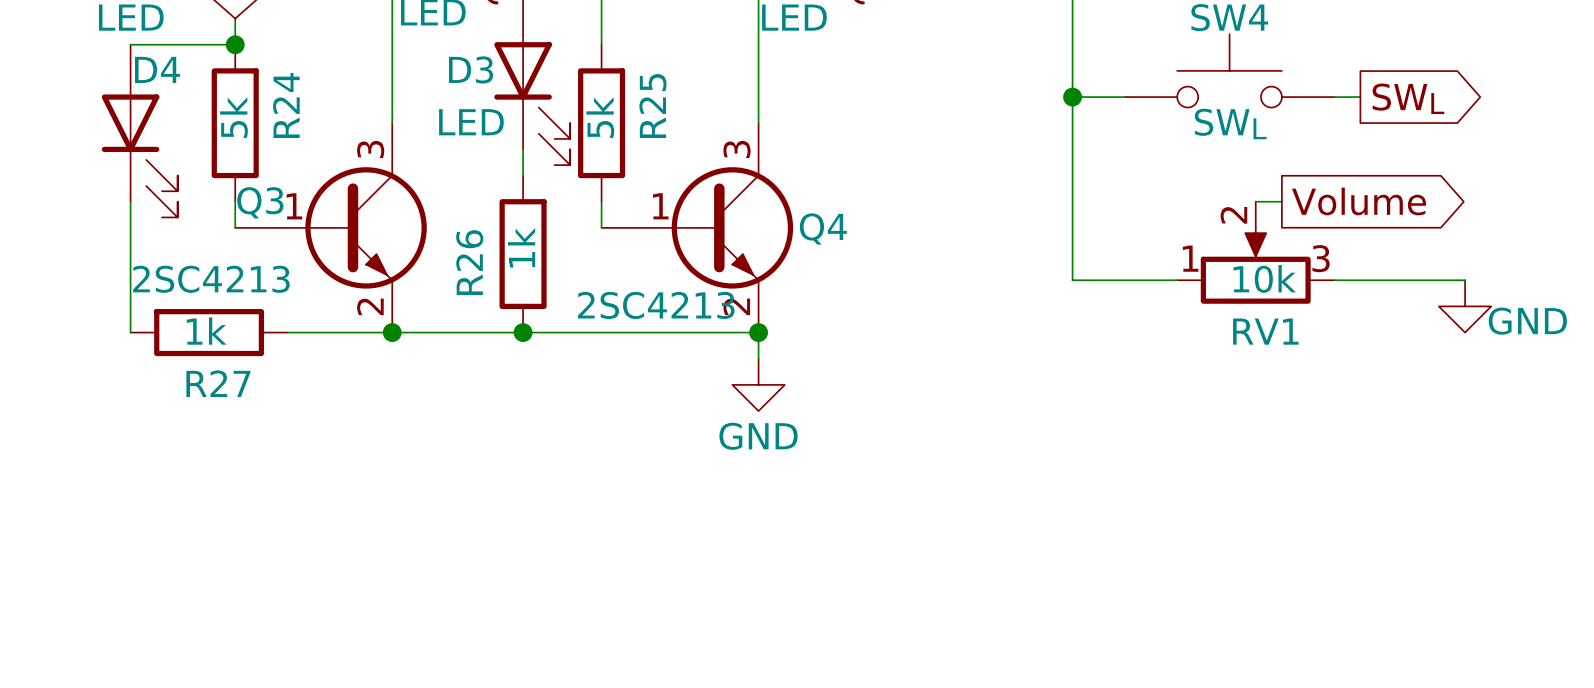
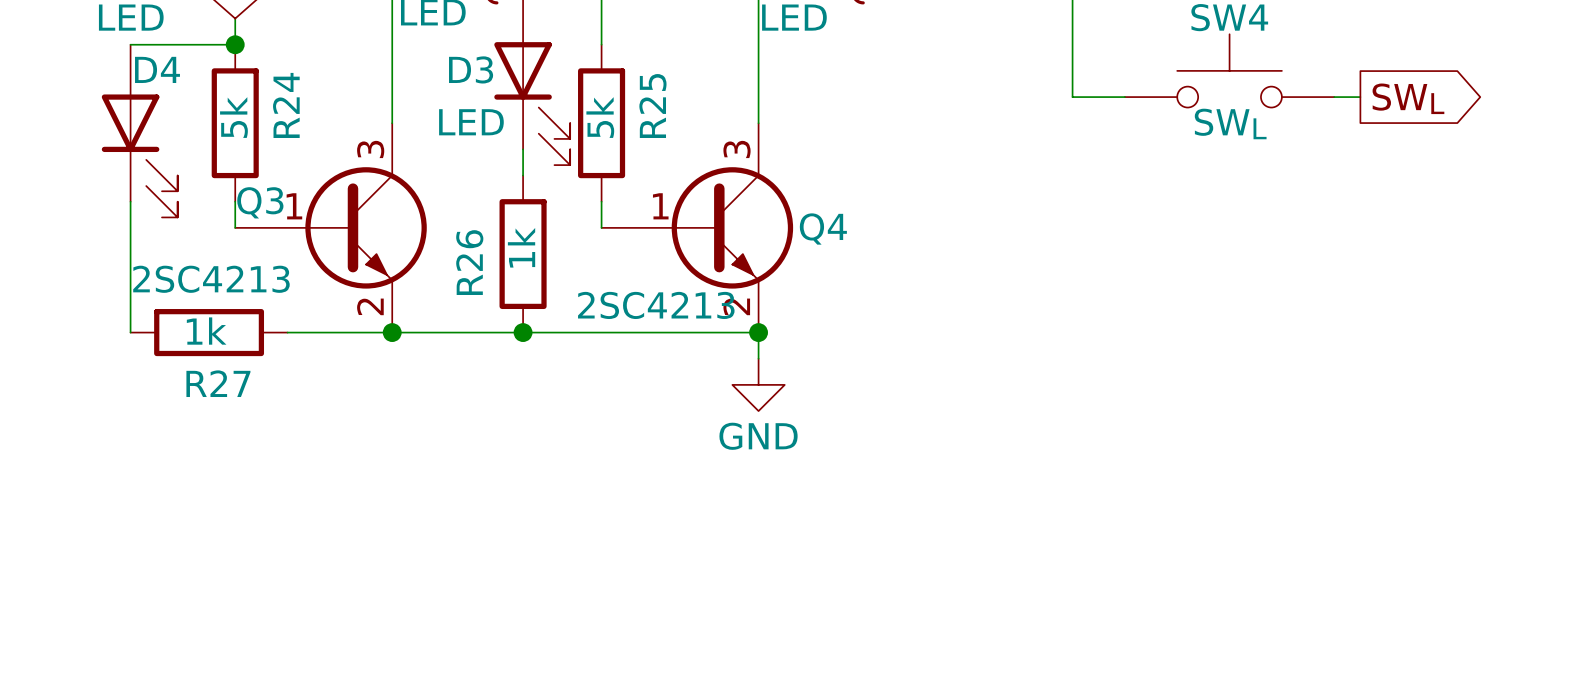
wire: (1072, 97) (1072, 280) (1177, 280) -> none
junction: (1072, 97) -> none
wire: (1255, 201) (1281, 201) -> none
global label: Volume (1359, 201) -> none
RV1: 10k (1255, 252) -> none
wire: (1334, 280) (1465, 280) -> none
power symbol: GND (1465, 306) -> none

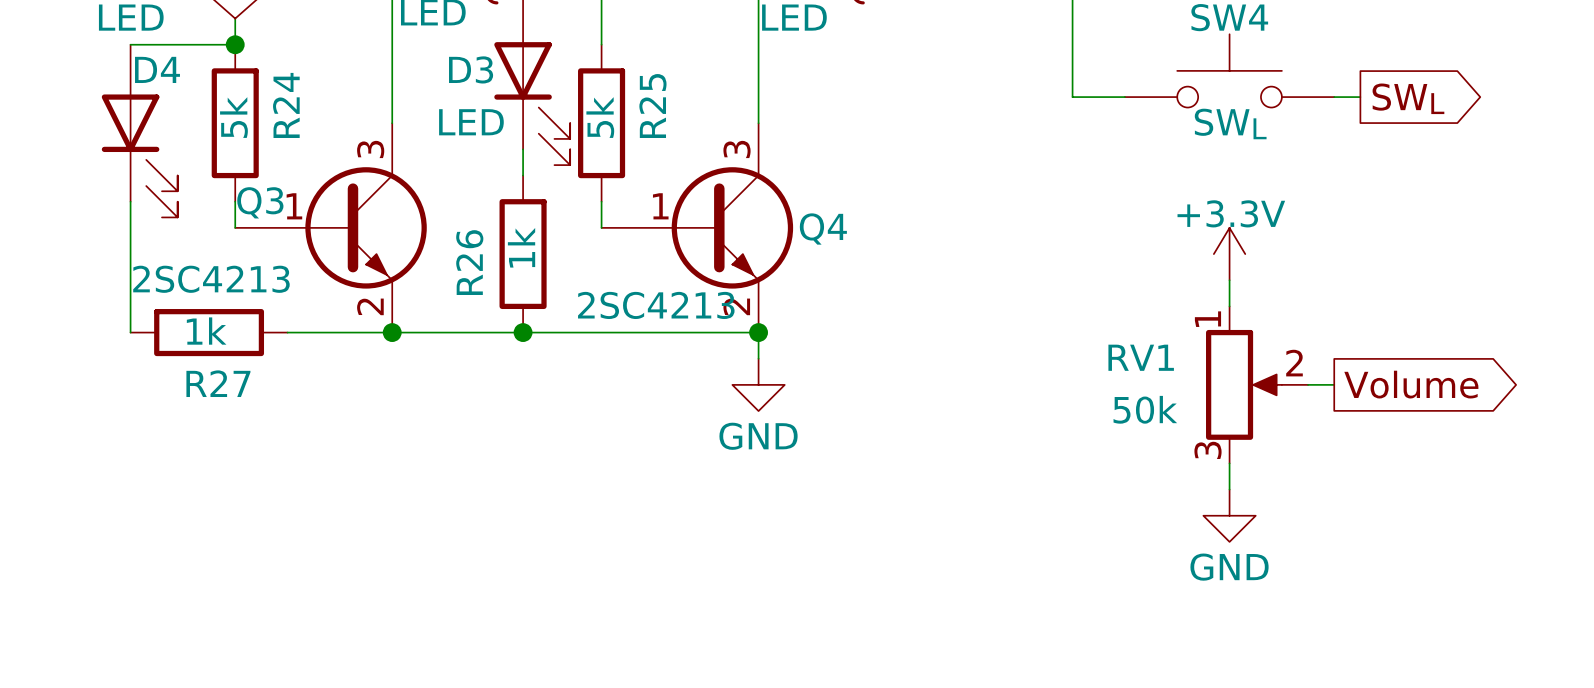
power symbol: none -> +3.3V (1229, 254)
wire: none -> (1229, 280) (1229, 306)
RV1: none -> 50k (1257, 384)
wire: none -> (1308, 384) (1334, 384)
global label: none -> Volume (1411, 384)
wire: none -> (1229, 463) (1229, 489)
power symbol: none -> GND (1229, 515)

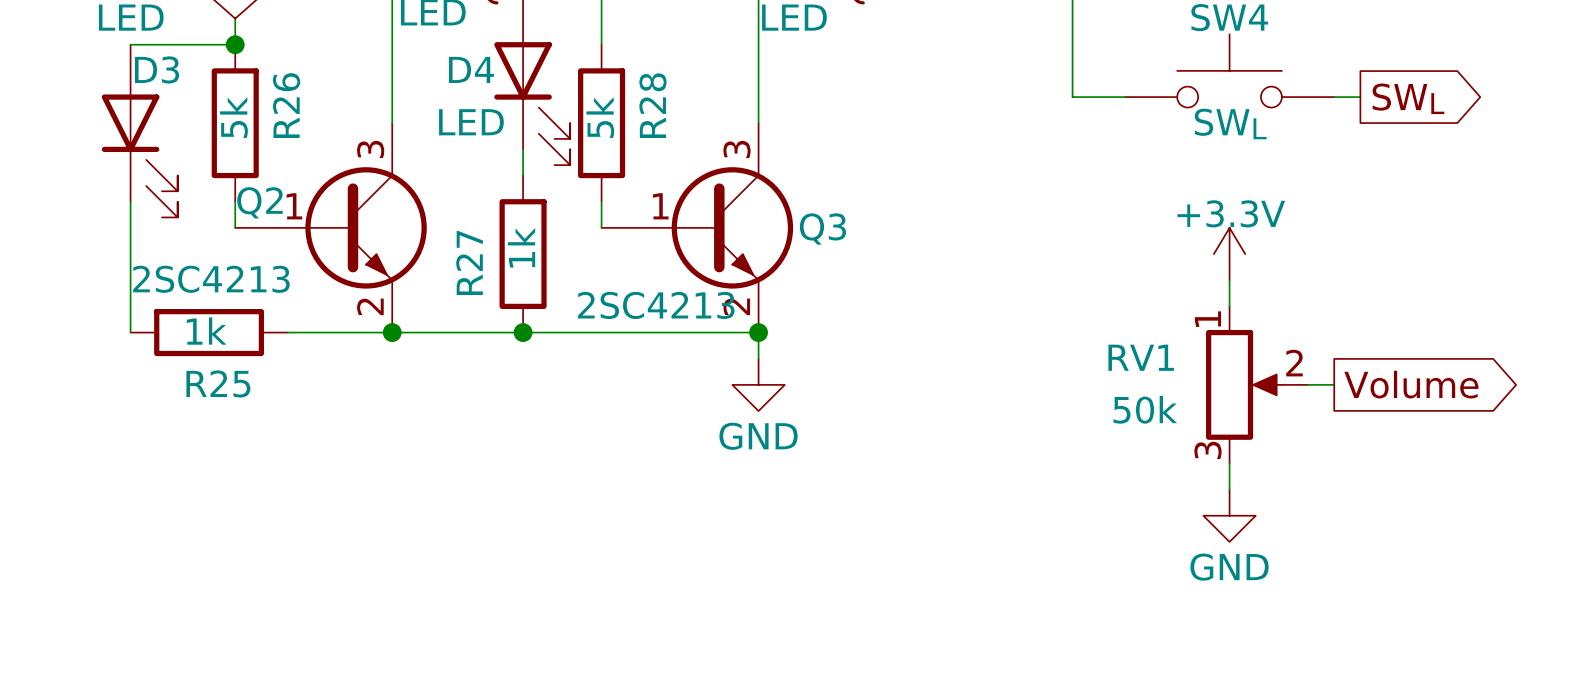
D4 name: D4 (157, 69) -> D3 (157, 69)
D3 name: D3 (471, 69) -> D4 (471, 69)
R24 name: R24 (286, 105) -> R26 (286, 105)
R25 name: R25 (652, 106) -> R28 (652, 105)
Q3 name: Q3 (260, 202) -> Q2 (259, 202)
Q4 name: Q4 (823, 229) -> Q3 (822, 229)
R26 name: R26 (469, 262) -> R27 (469, 262)
R27 name: R27 (218, 383) -> R25 (218, 383)

